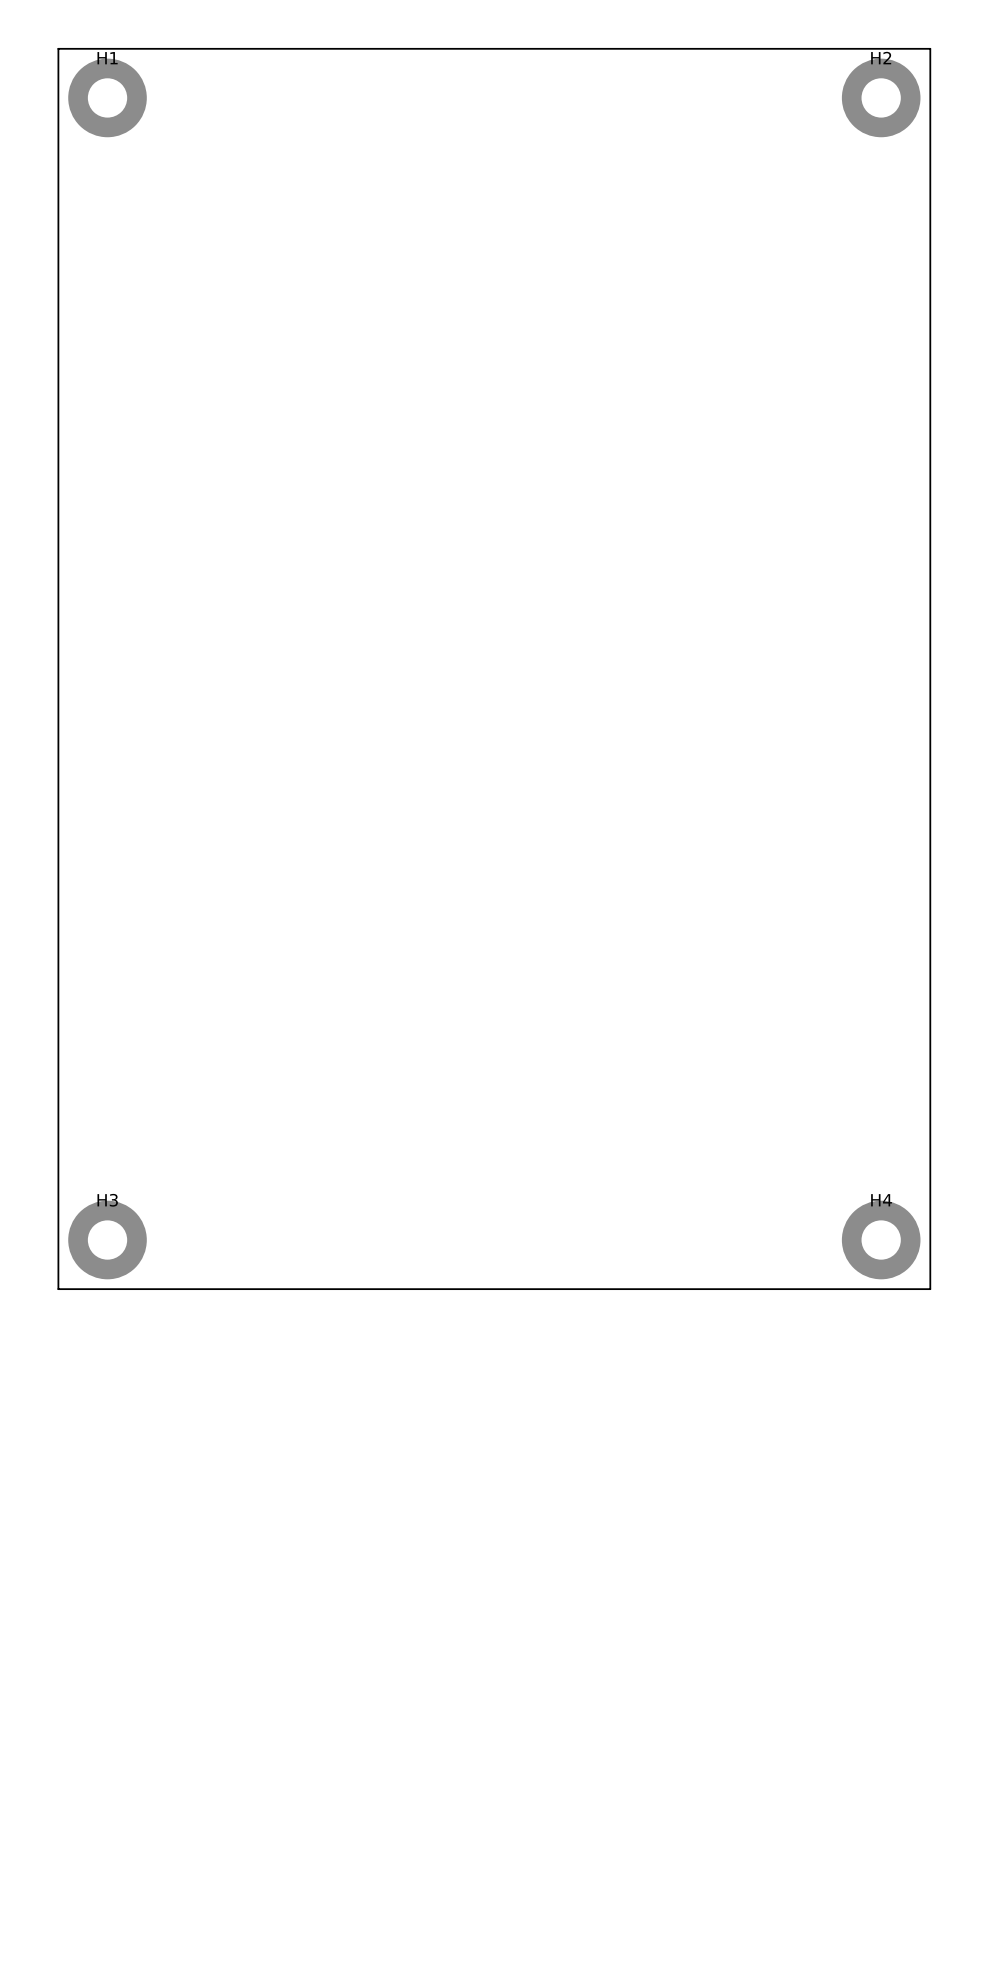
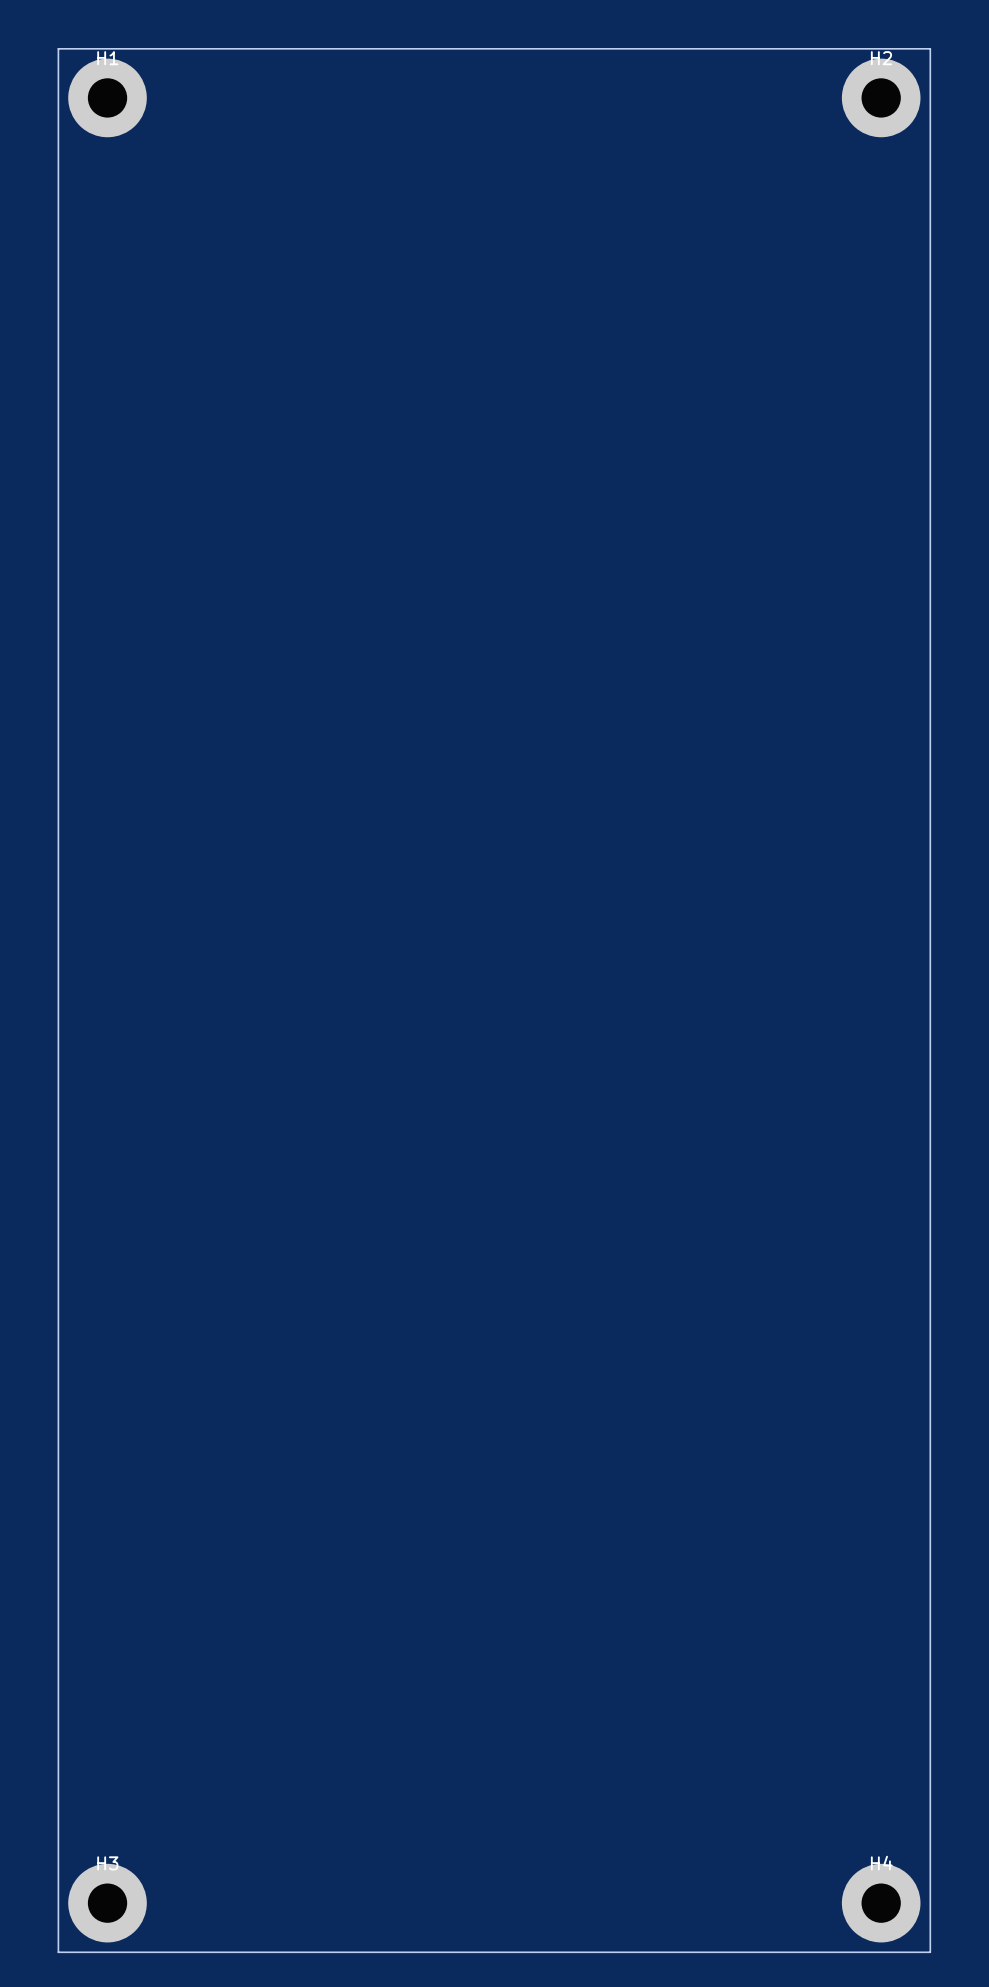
H3 position: (107, 1240) -> (107, 1903)
H4 position: (881, 1240) -> (881, 1903)
board edge: (58, 1289) (930, 1289) -> (58, 1289) (58, 1952) (930, 1952) (930, 1289)

